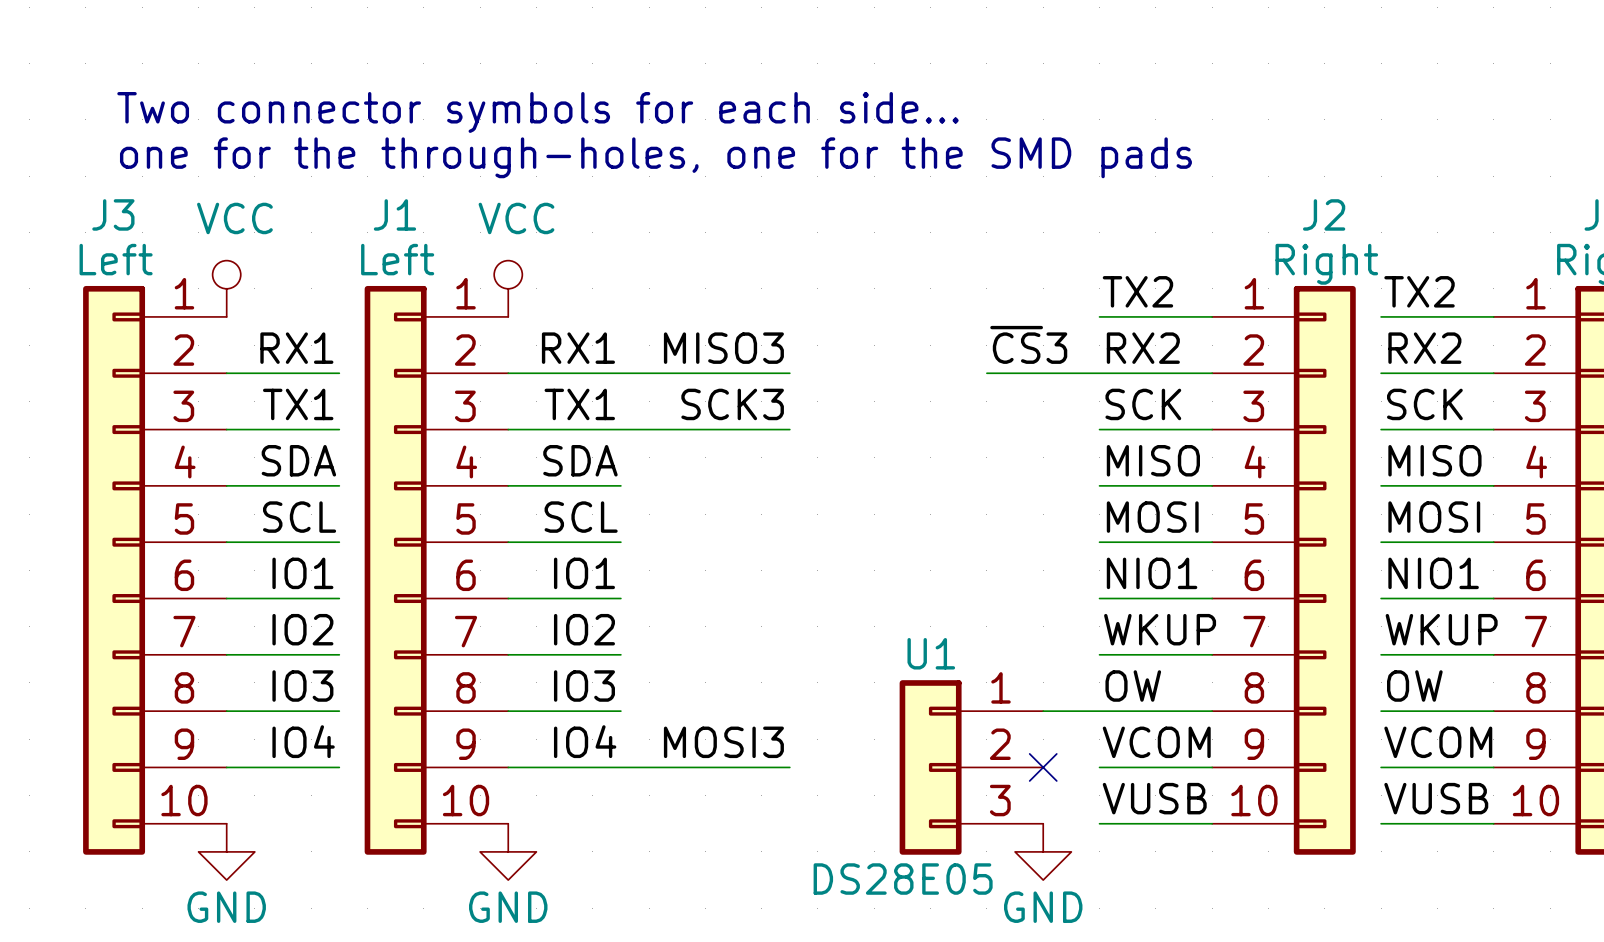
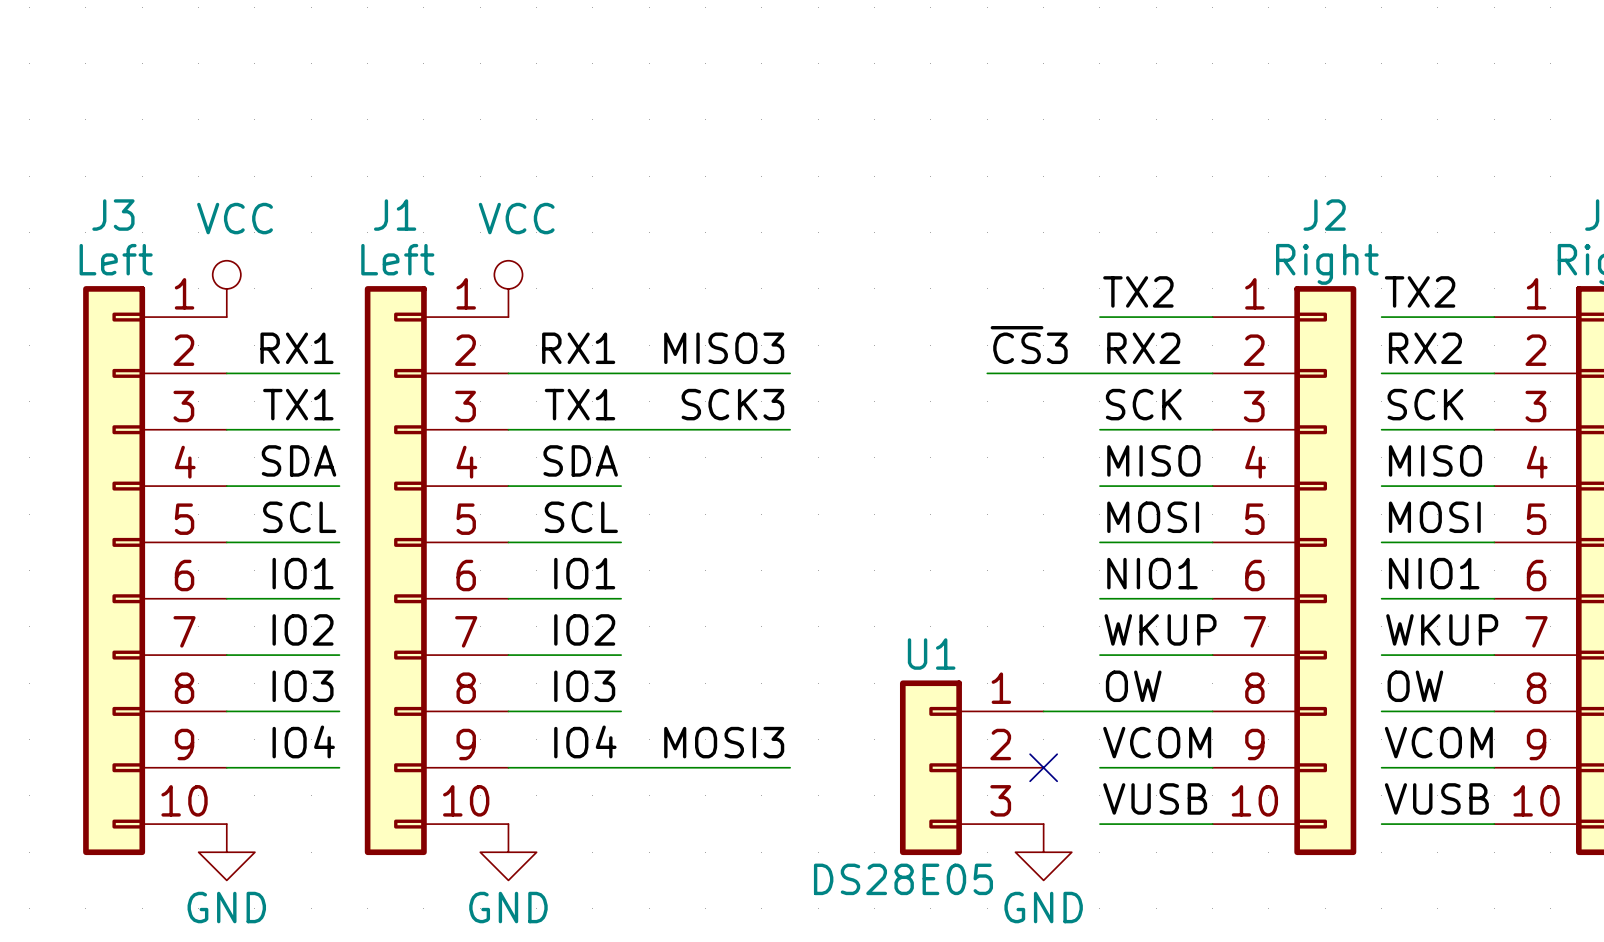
text: Two connector symbols for each side… (537, 112) -> none
text: one for the through-holes, one for the SMD pads (655, 157) -> none

